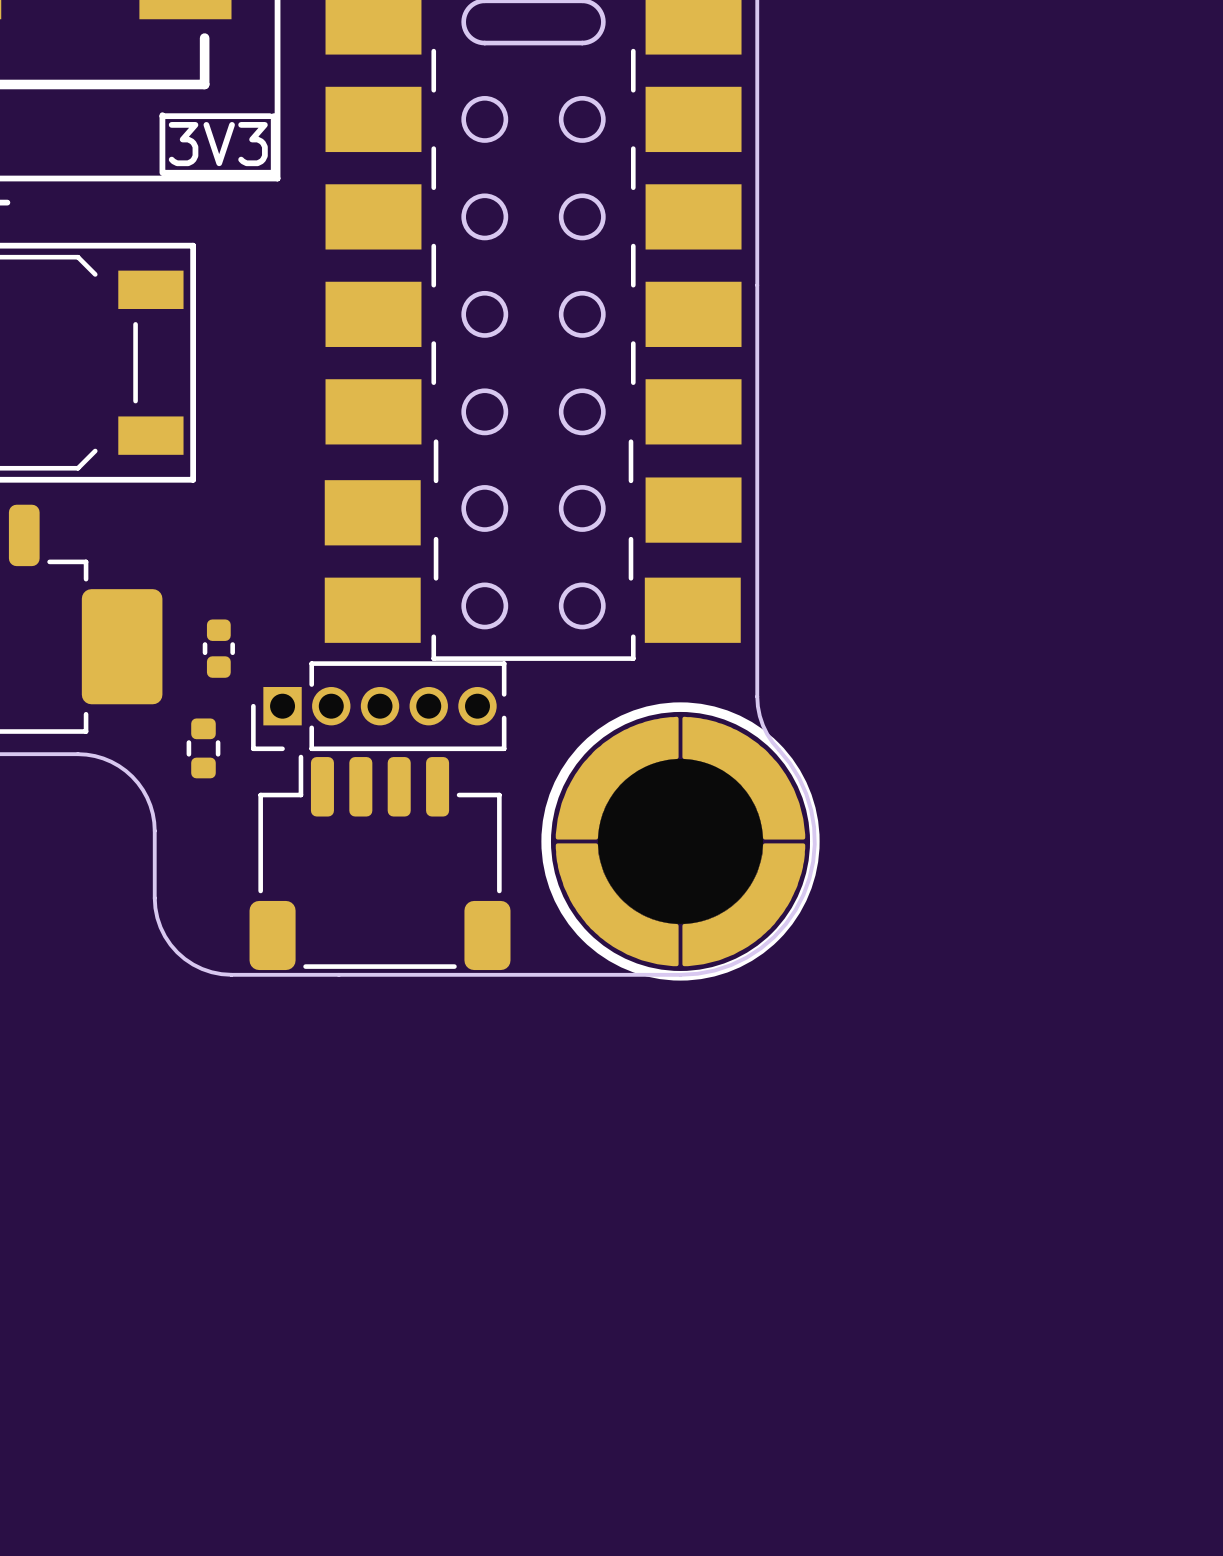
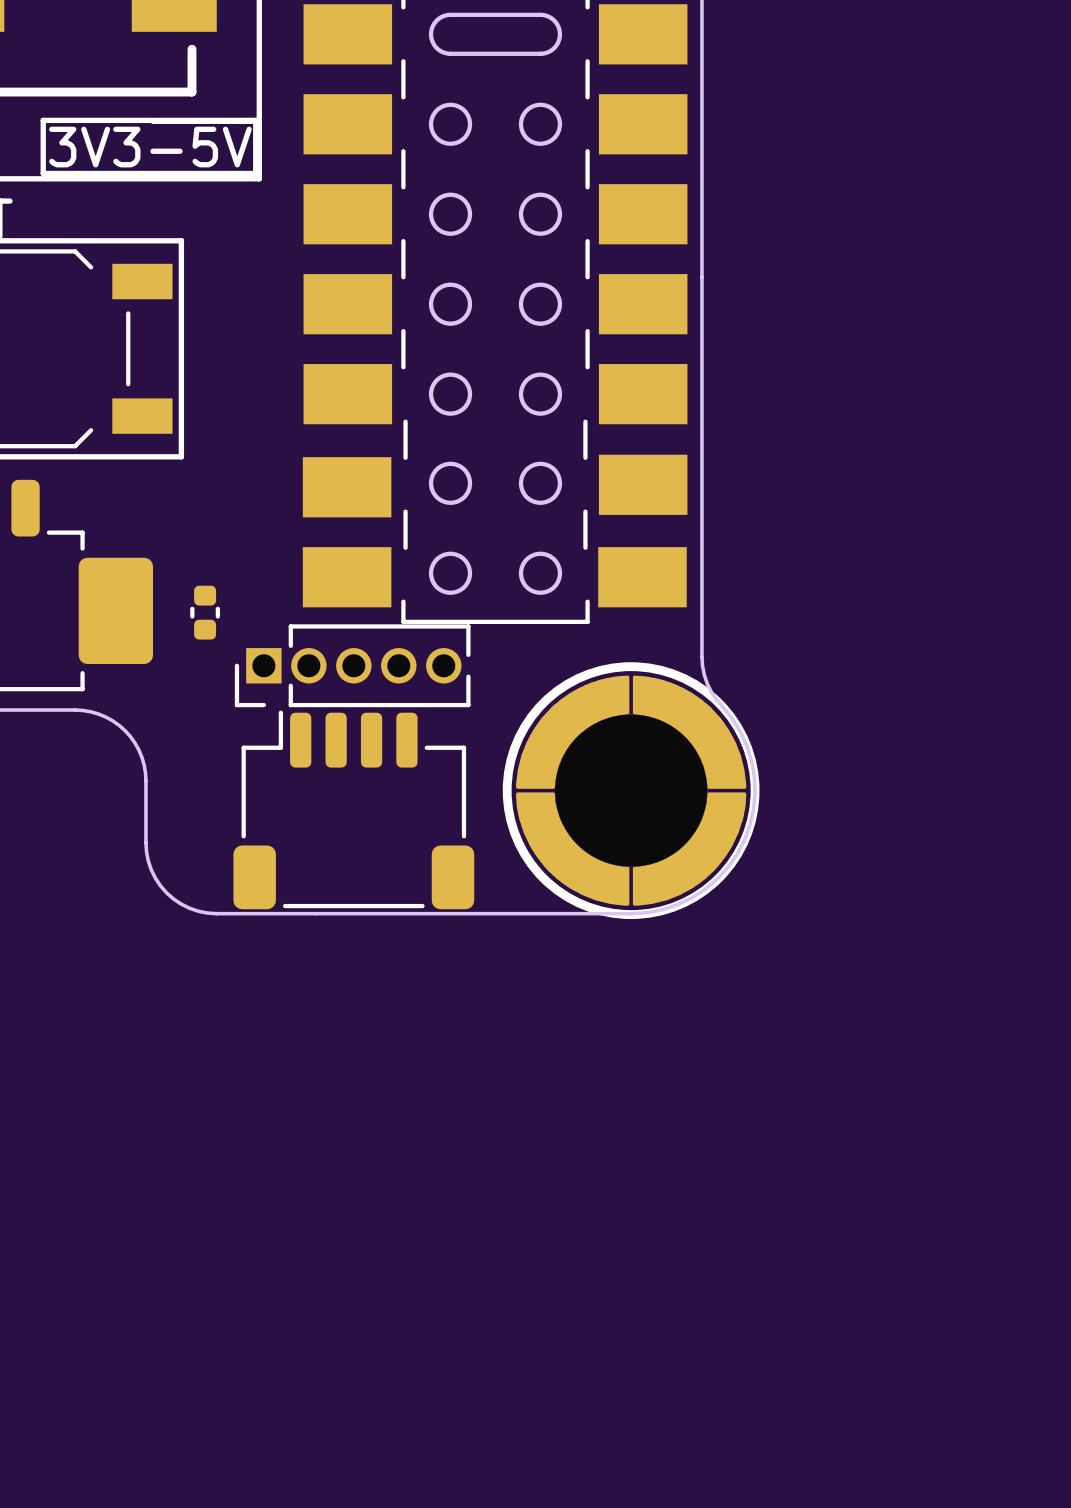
line: (162, 115) (162, 172) -> none
line: none -> (255, 121) (43, 120) (43, 173) (154, 173)
text: 3V3 (218, 144) -> 3V3-5V (150, 147)
part: (203, 748) -> none

